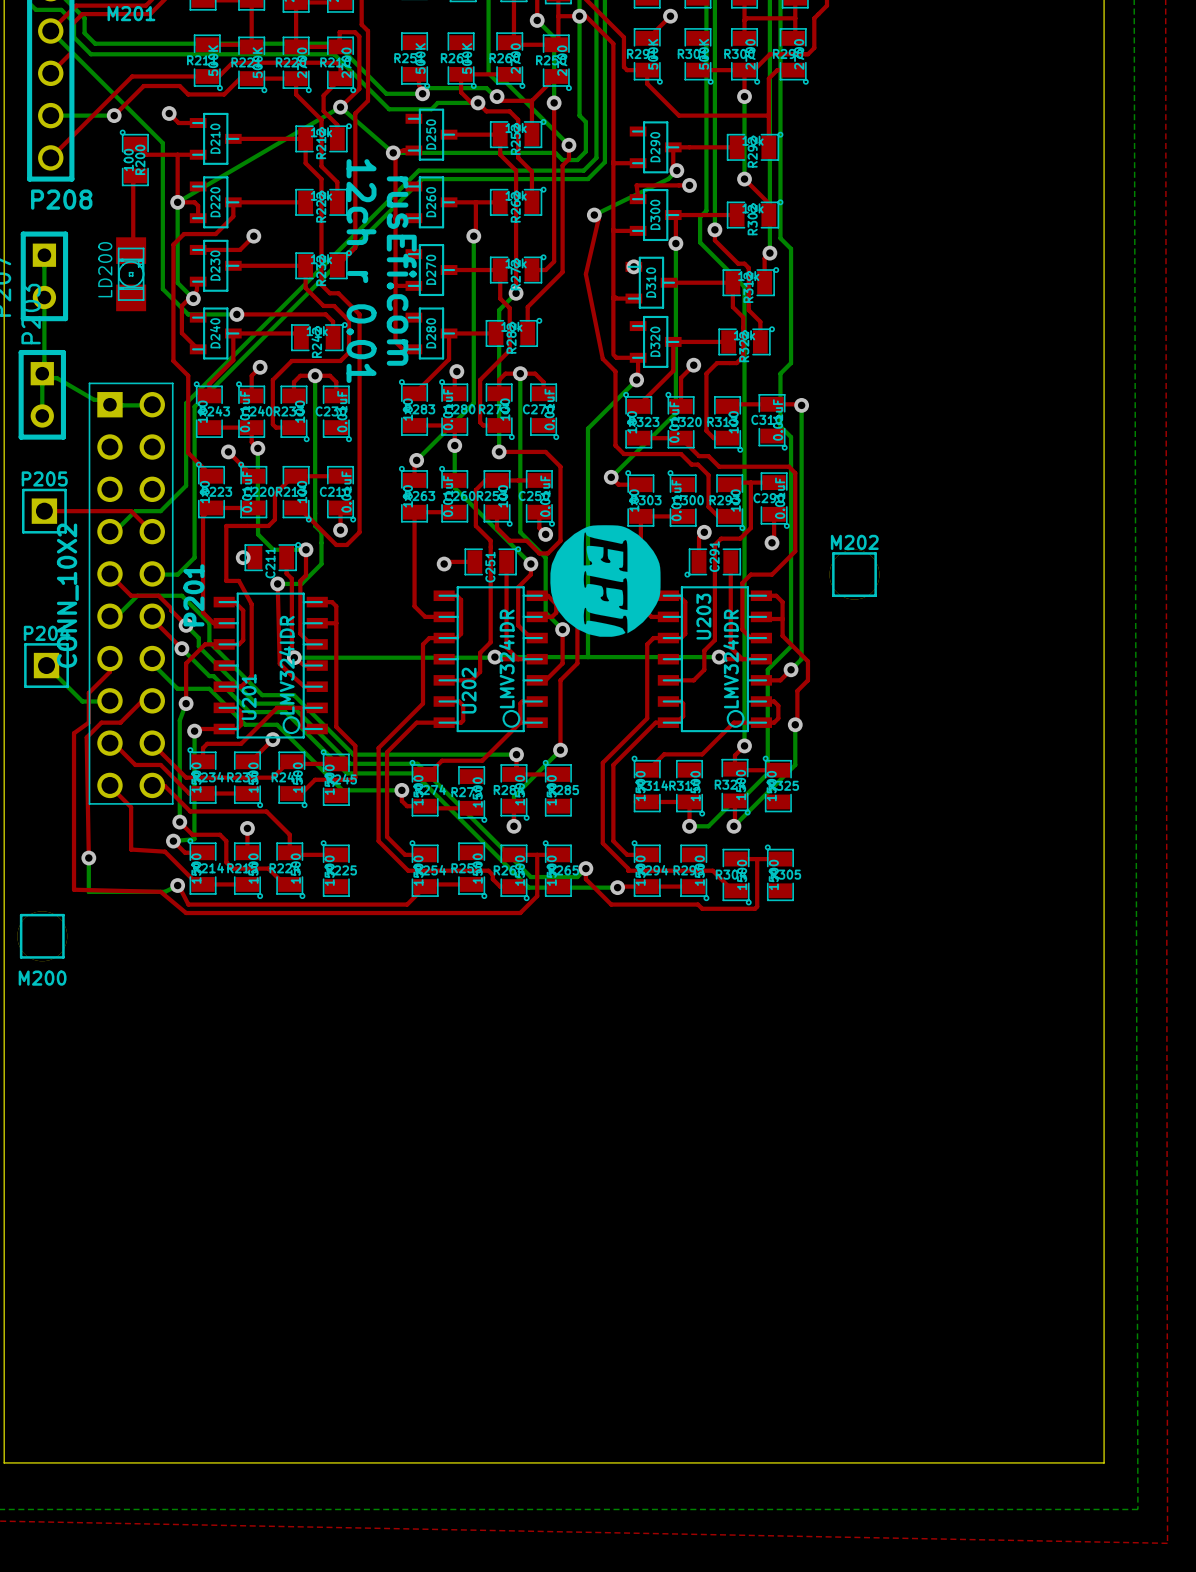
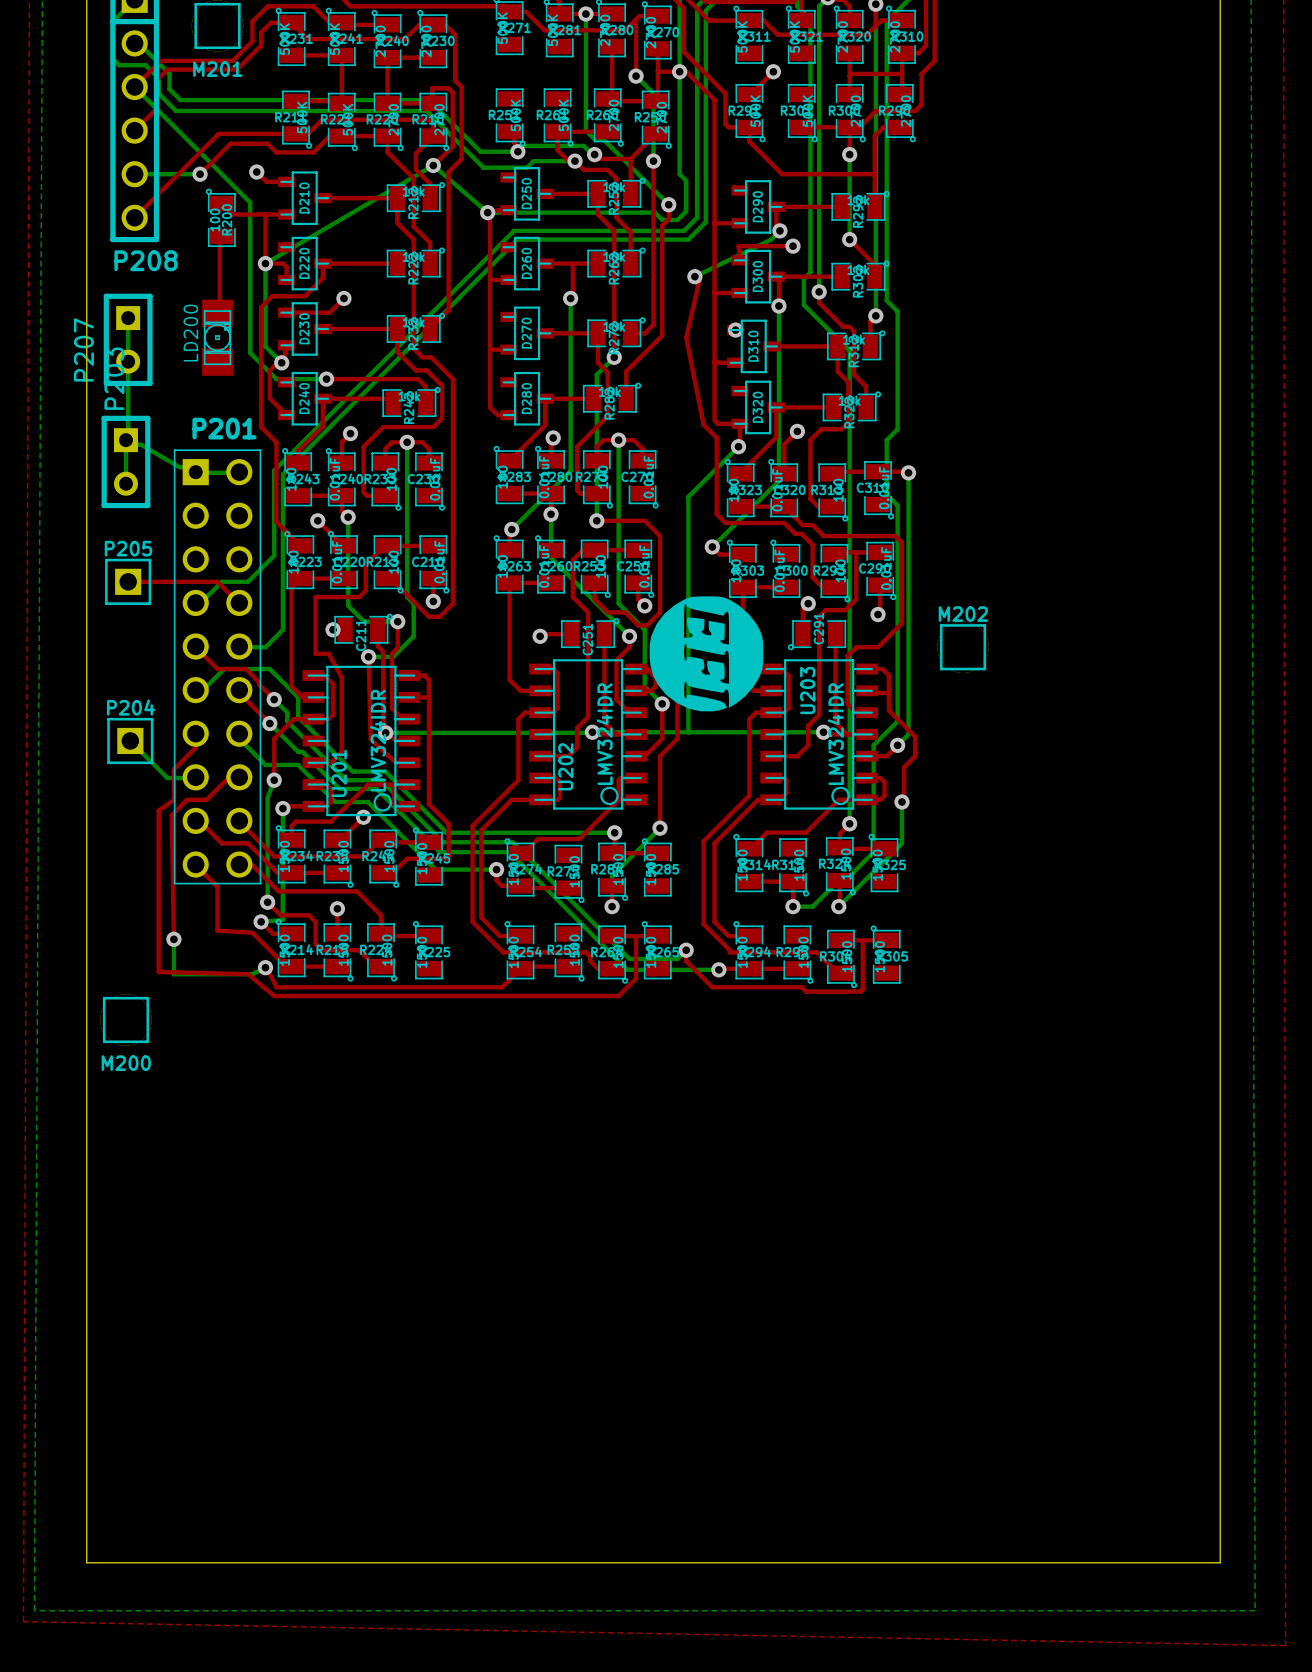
text: 12ch r 0.01 (361, 271) -> none
text: rusEfi.com (401, 271) -> none
P201 value: CONN_10X2 (67, 595) -> none
P201 name rotation: 0° (193, 595) -> 90° clockwise (224, 428)
P201 name position: P201 (193, 595) -> P201 (224, 428)

